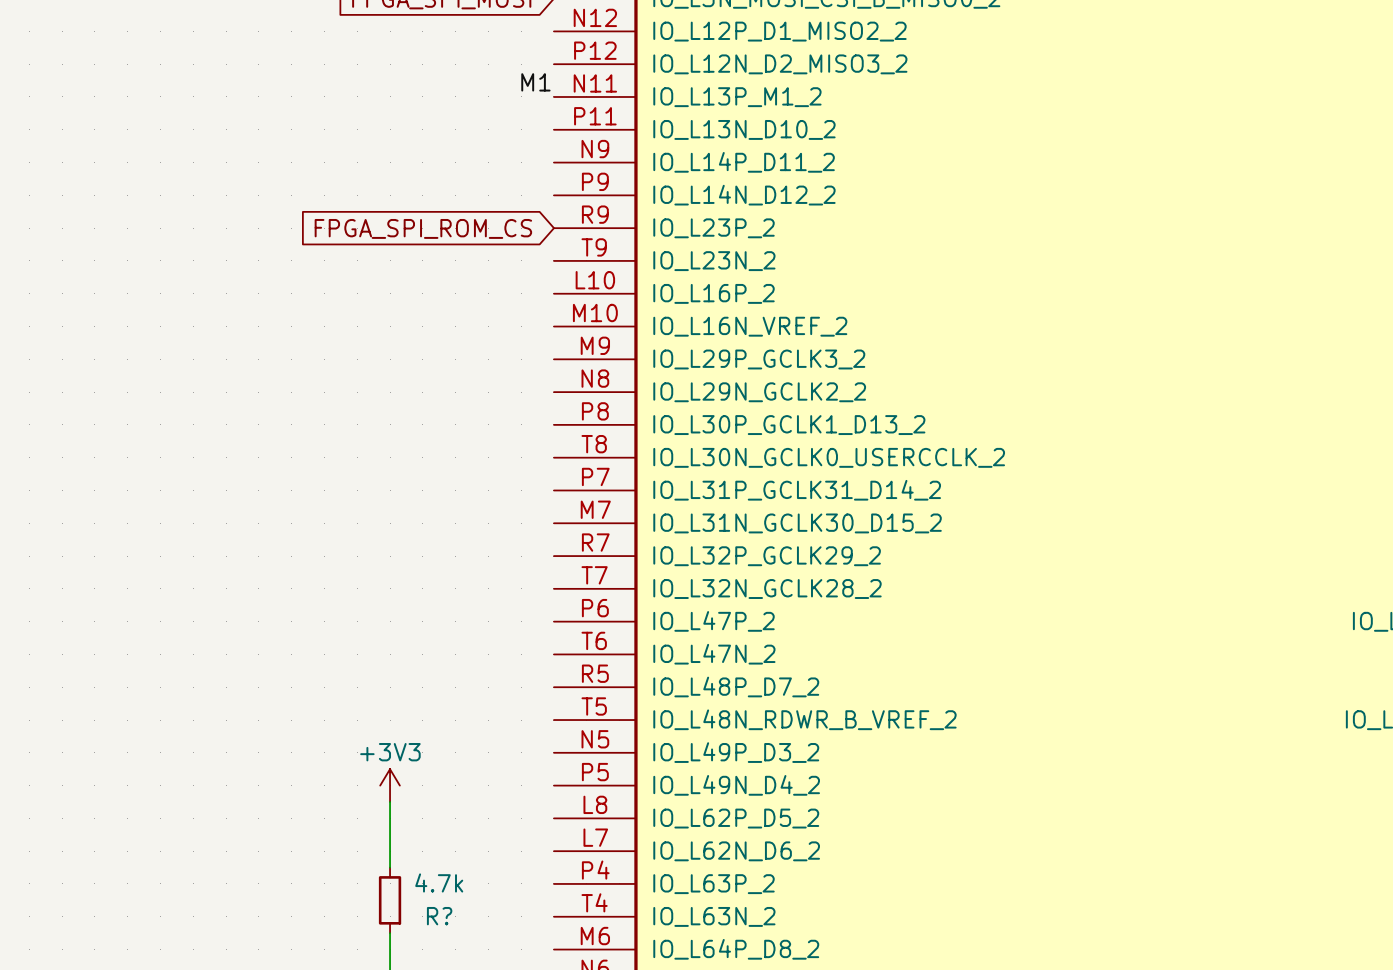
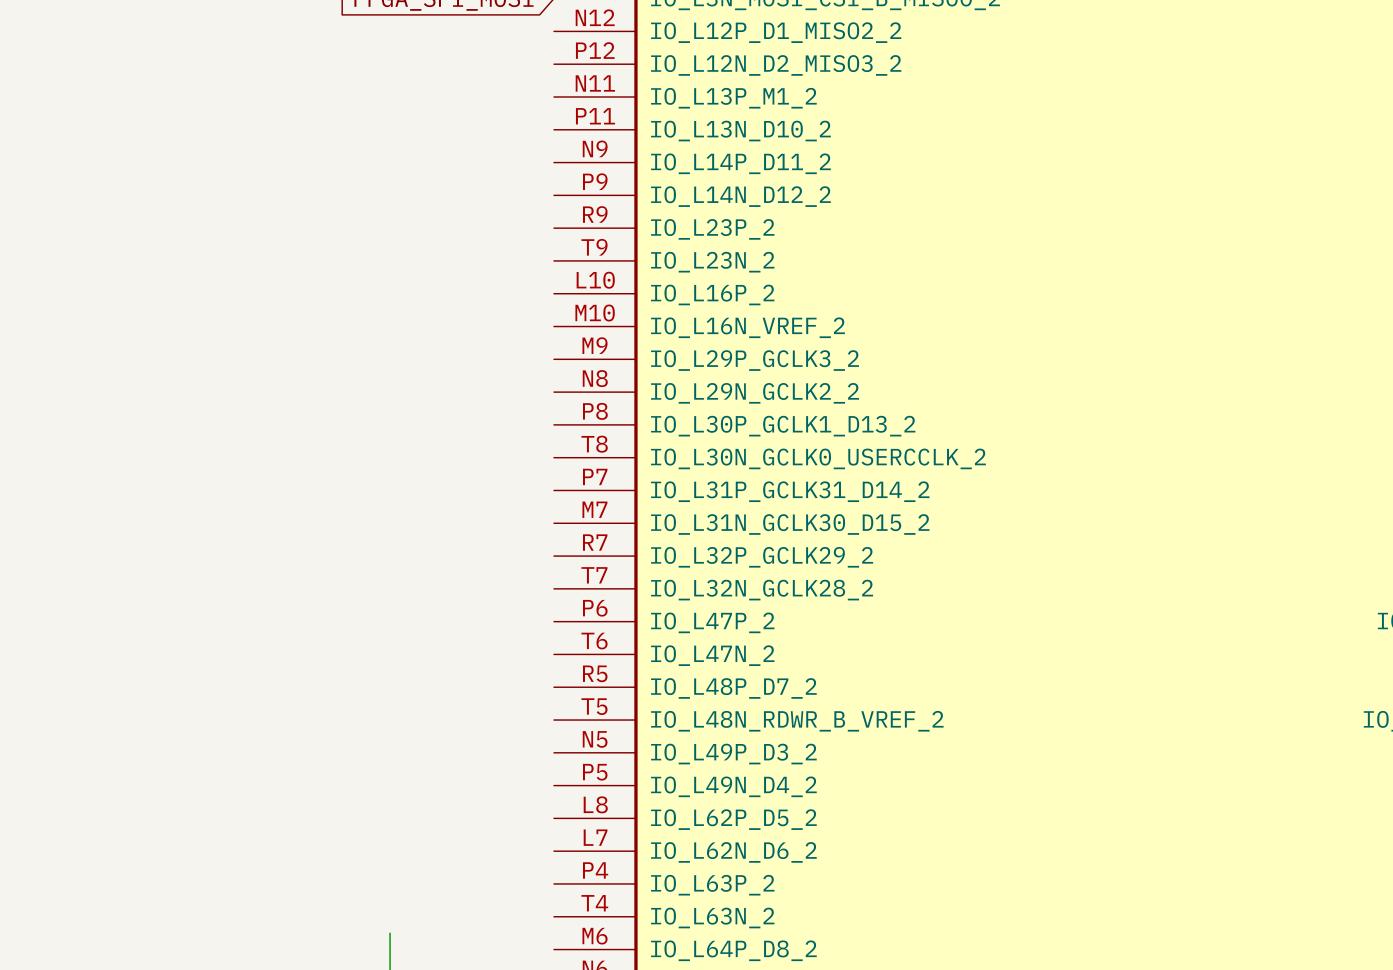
label: M1 (535, 82) -> none
global label: FPGA_SPI_ROM_CS (423, 228) -> none
power symbol: +3V3 (390, 785) -> none
wire: (390, 801) (390, 867) -> none
R?: 4.7k (390, 900) -> none

